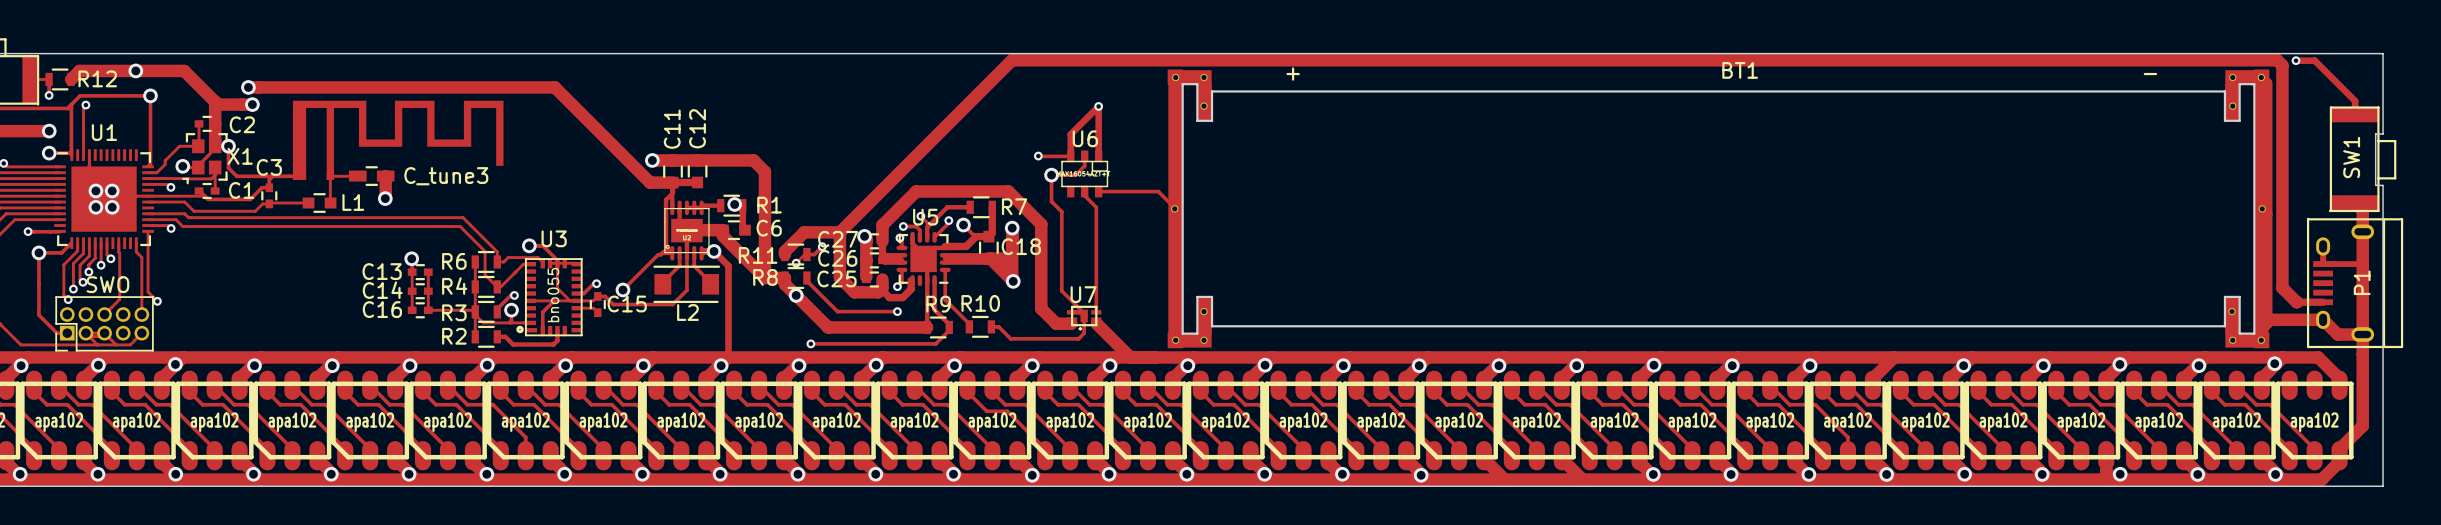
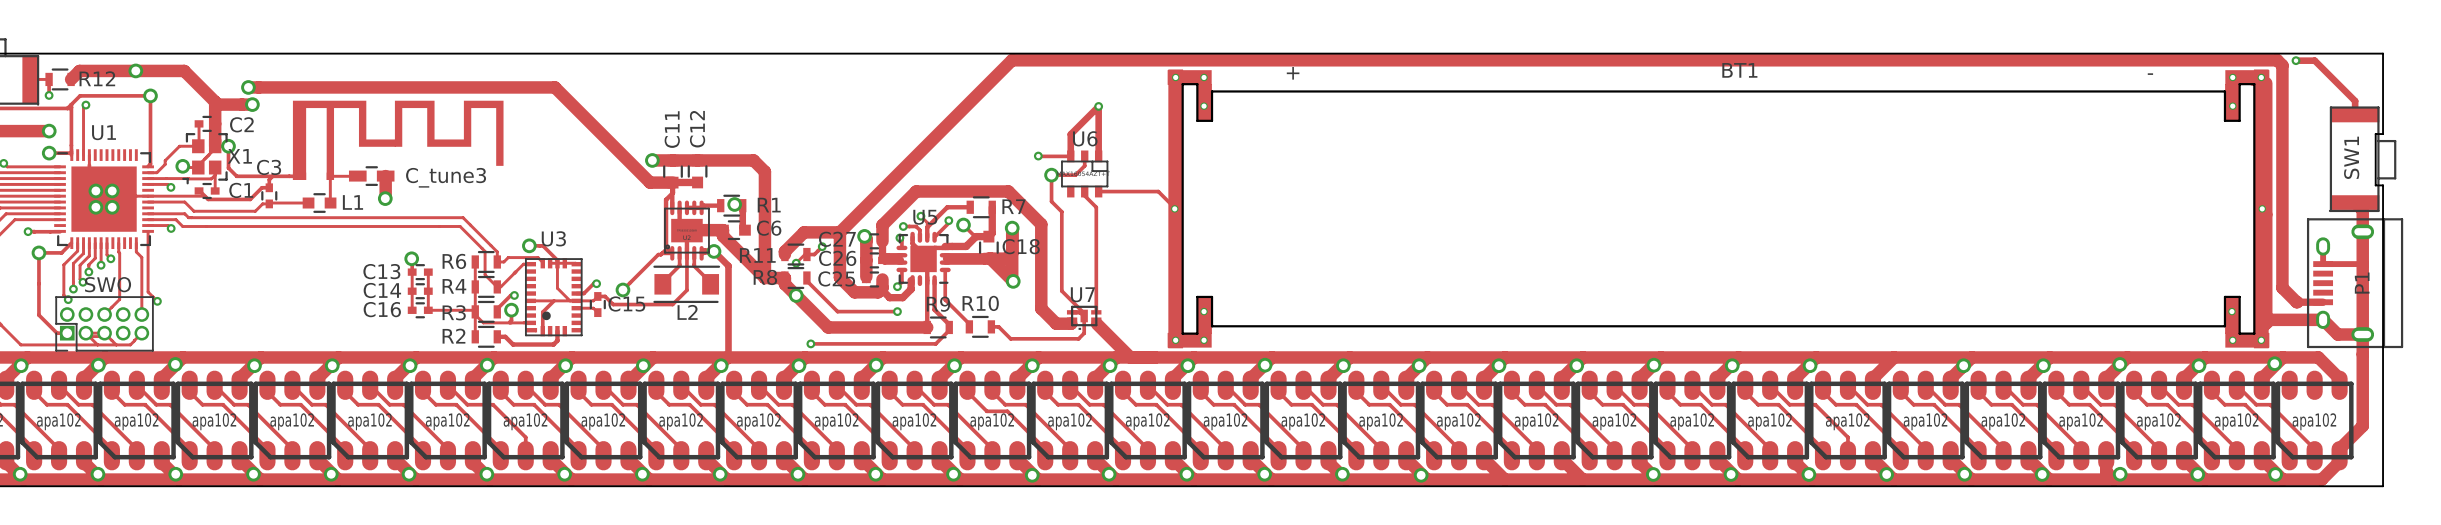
U3 footprint: [516, 258, 583, 337] -> [524, 258, 583, 337]
U3 value: bno055 (553, 295) -> none

